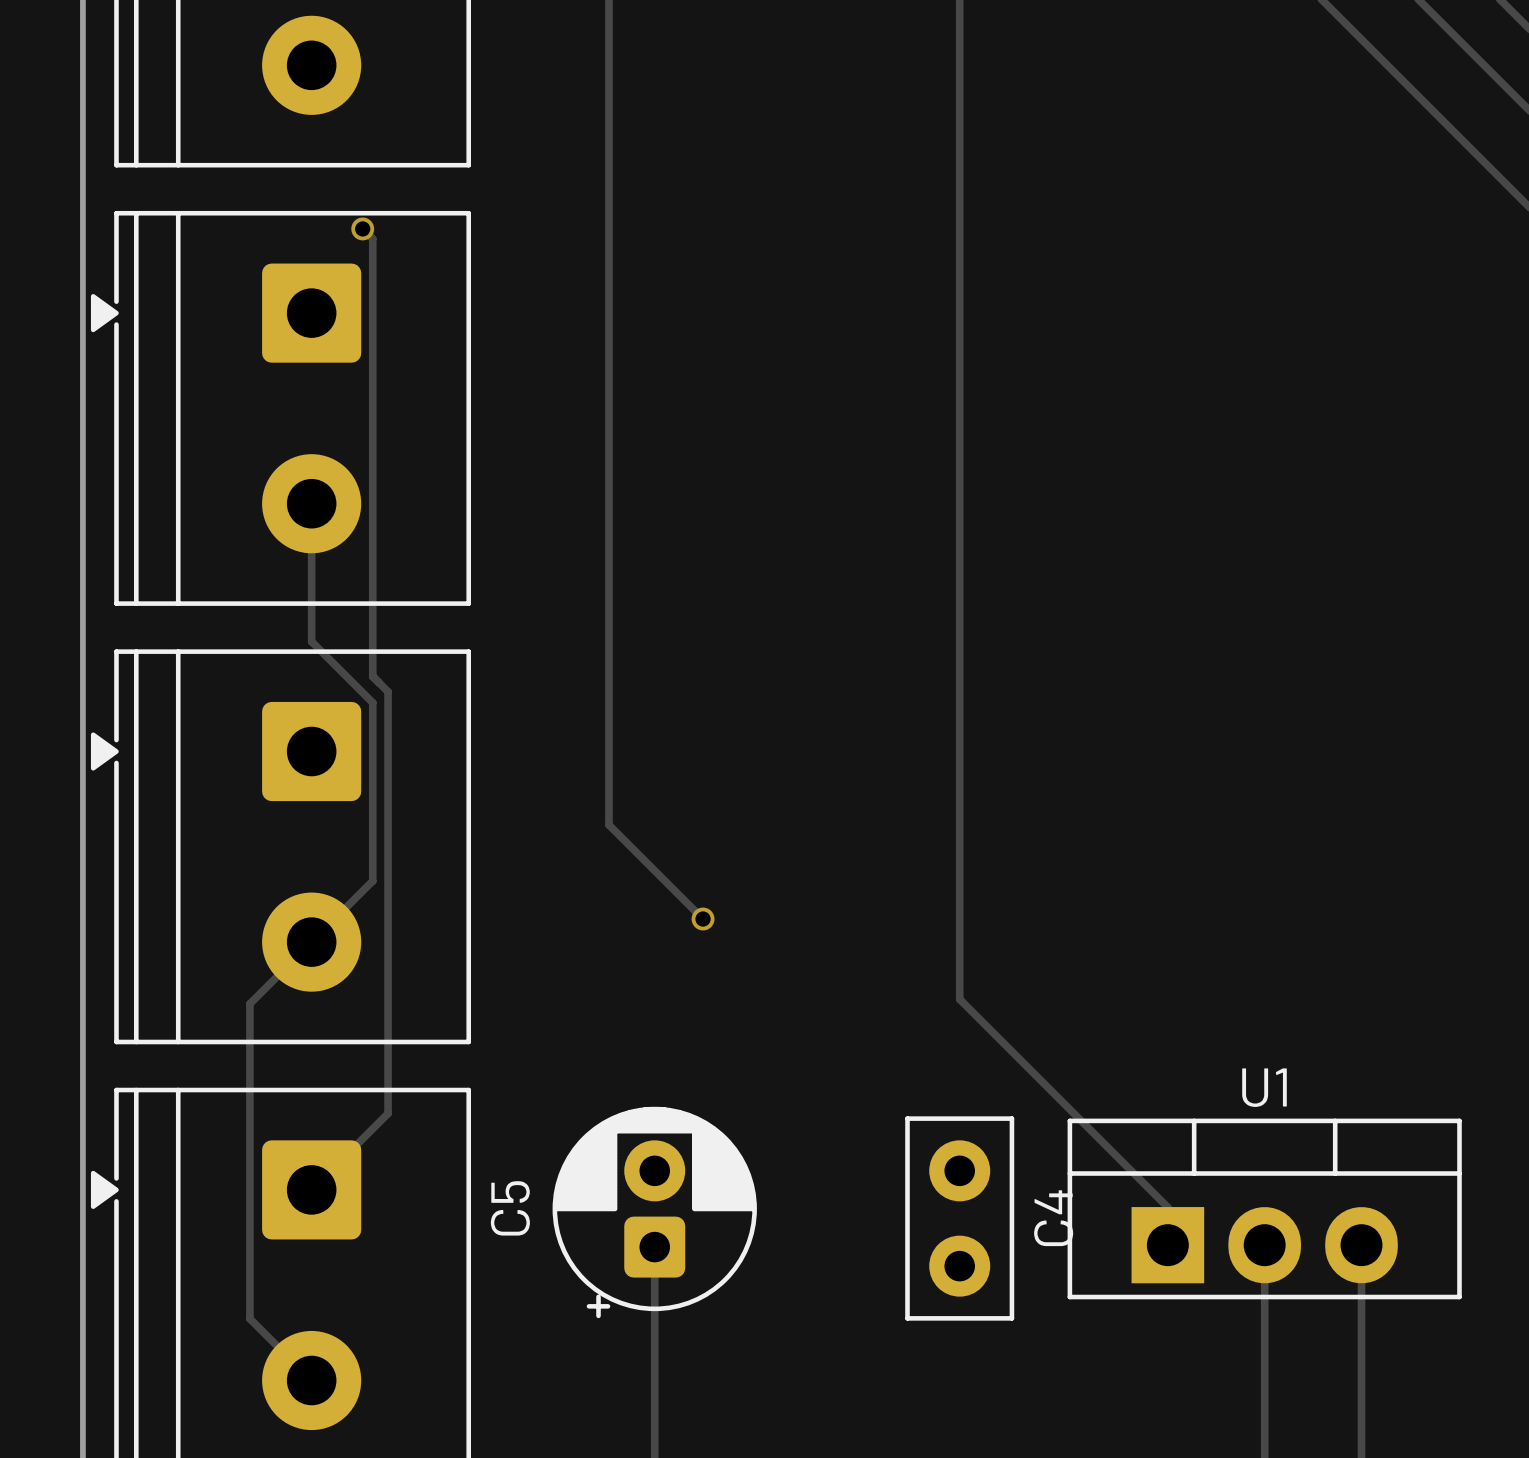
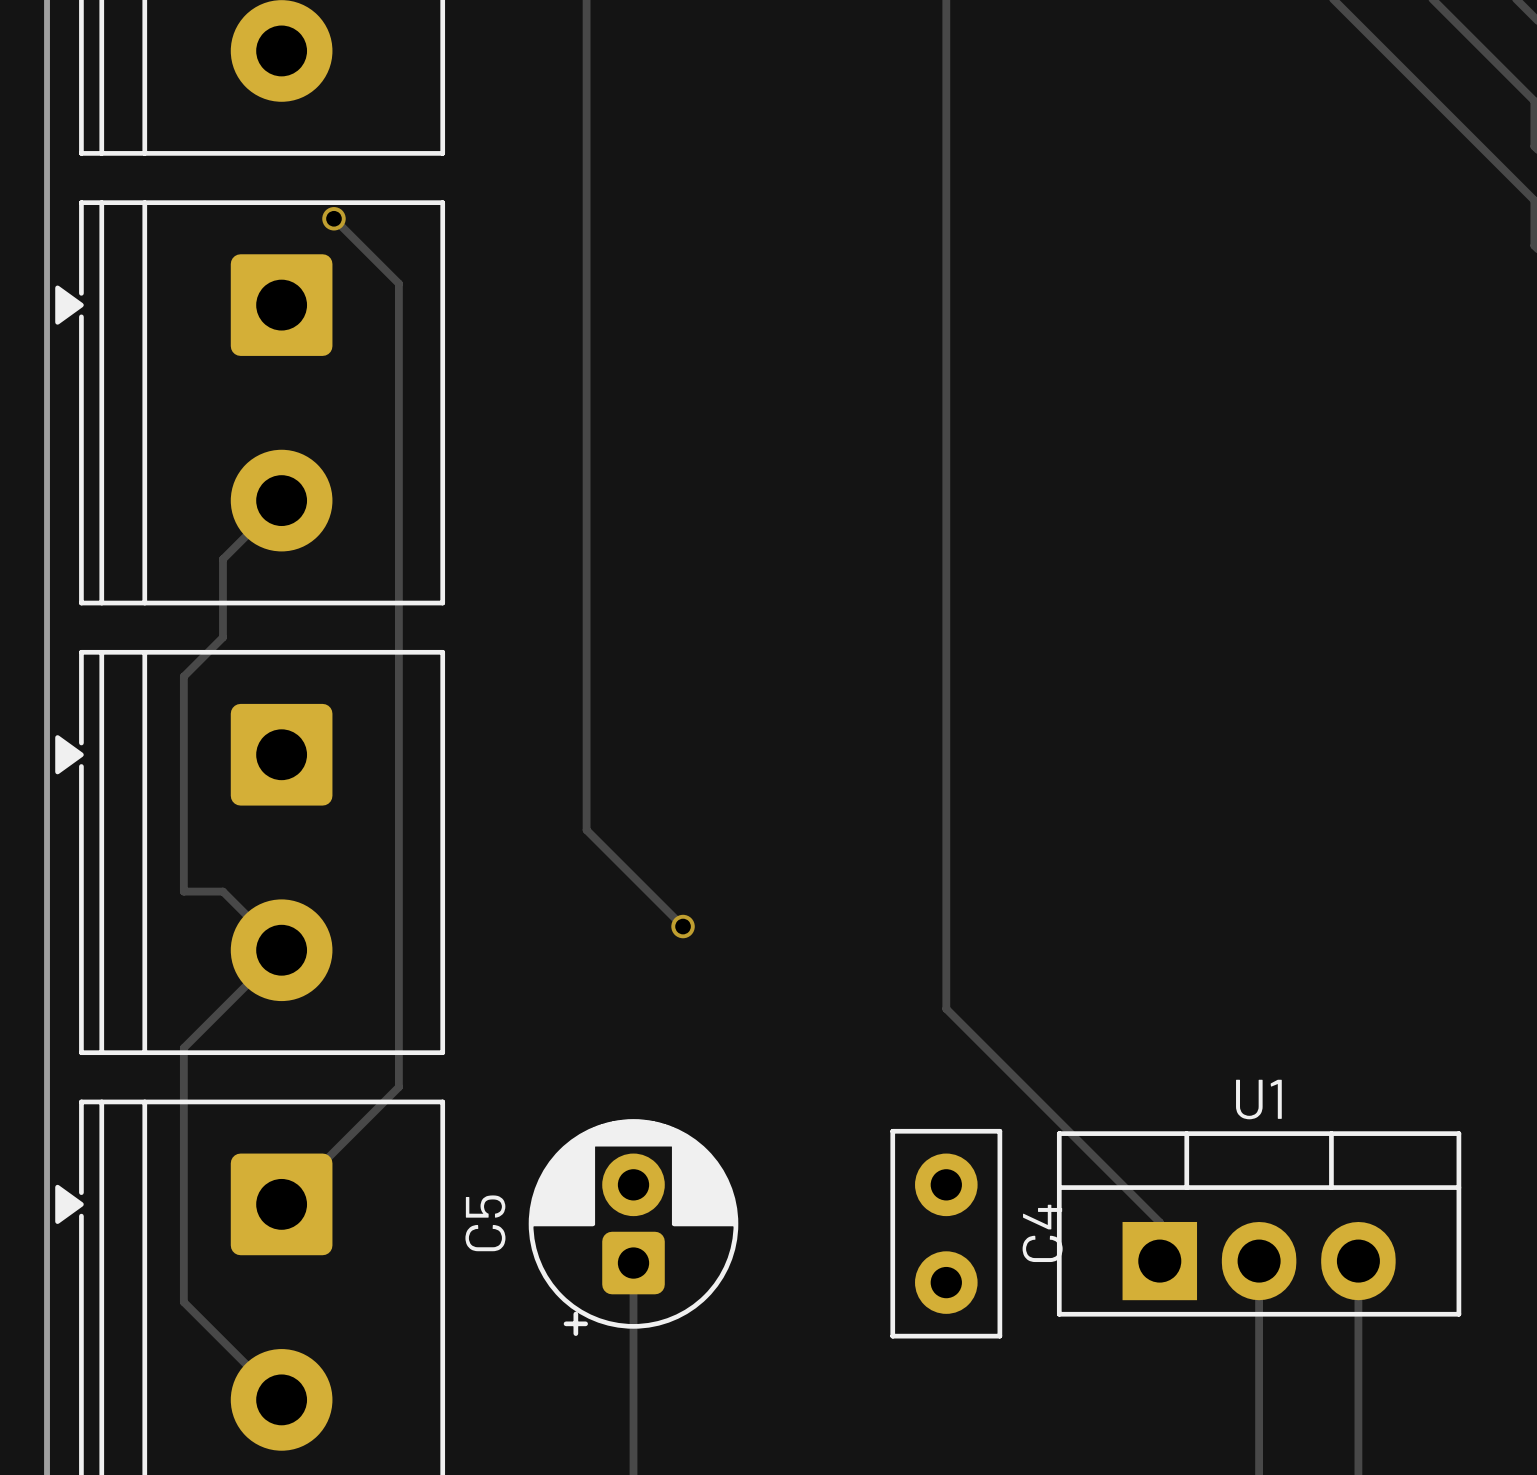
track: (372, 238) (372, 676) (388, 691) (388, 1113) -> (344, 229) (398, 283) (398, 1087) (359, 1126)
track: (311, 503) (311, 641) (372, 702) (372, 881) (311, 942) -> (281, 500) (222, 559) (222, 637) (183, 676) (183, 891) (222, 891) (281, 950)
track: (249, 1003) (249, 1318) -> (218, 1013) (183, 1047) (183, 1302) (218, 1336)

